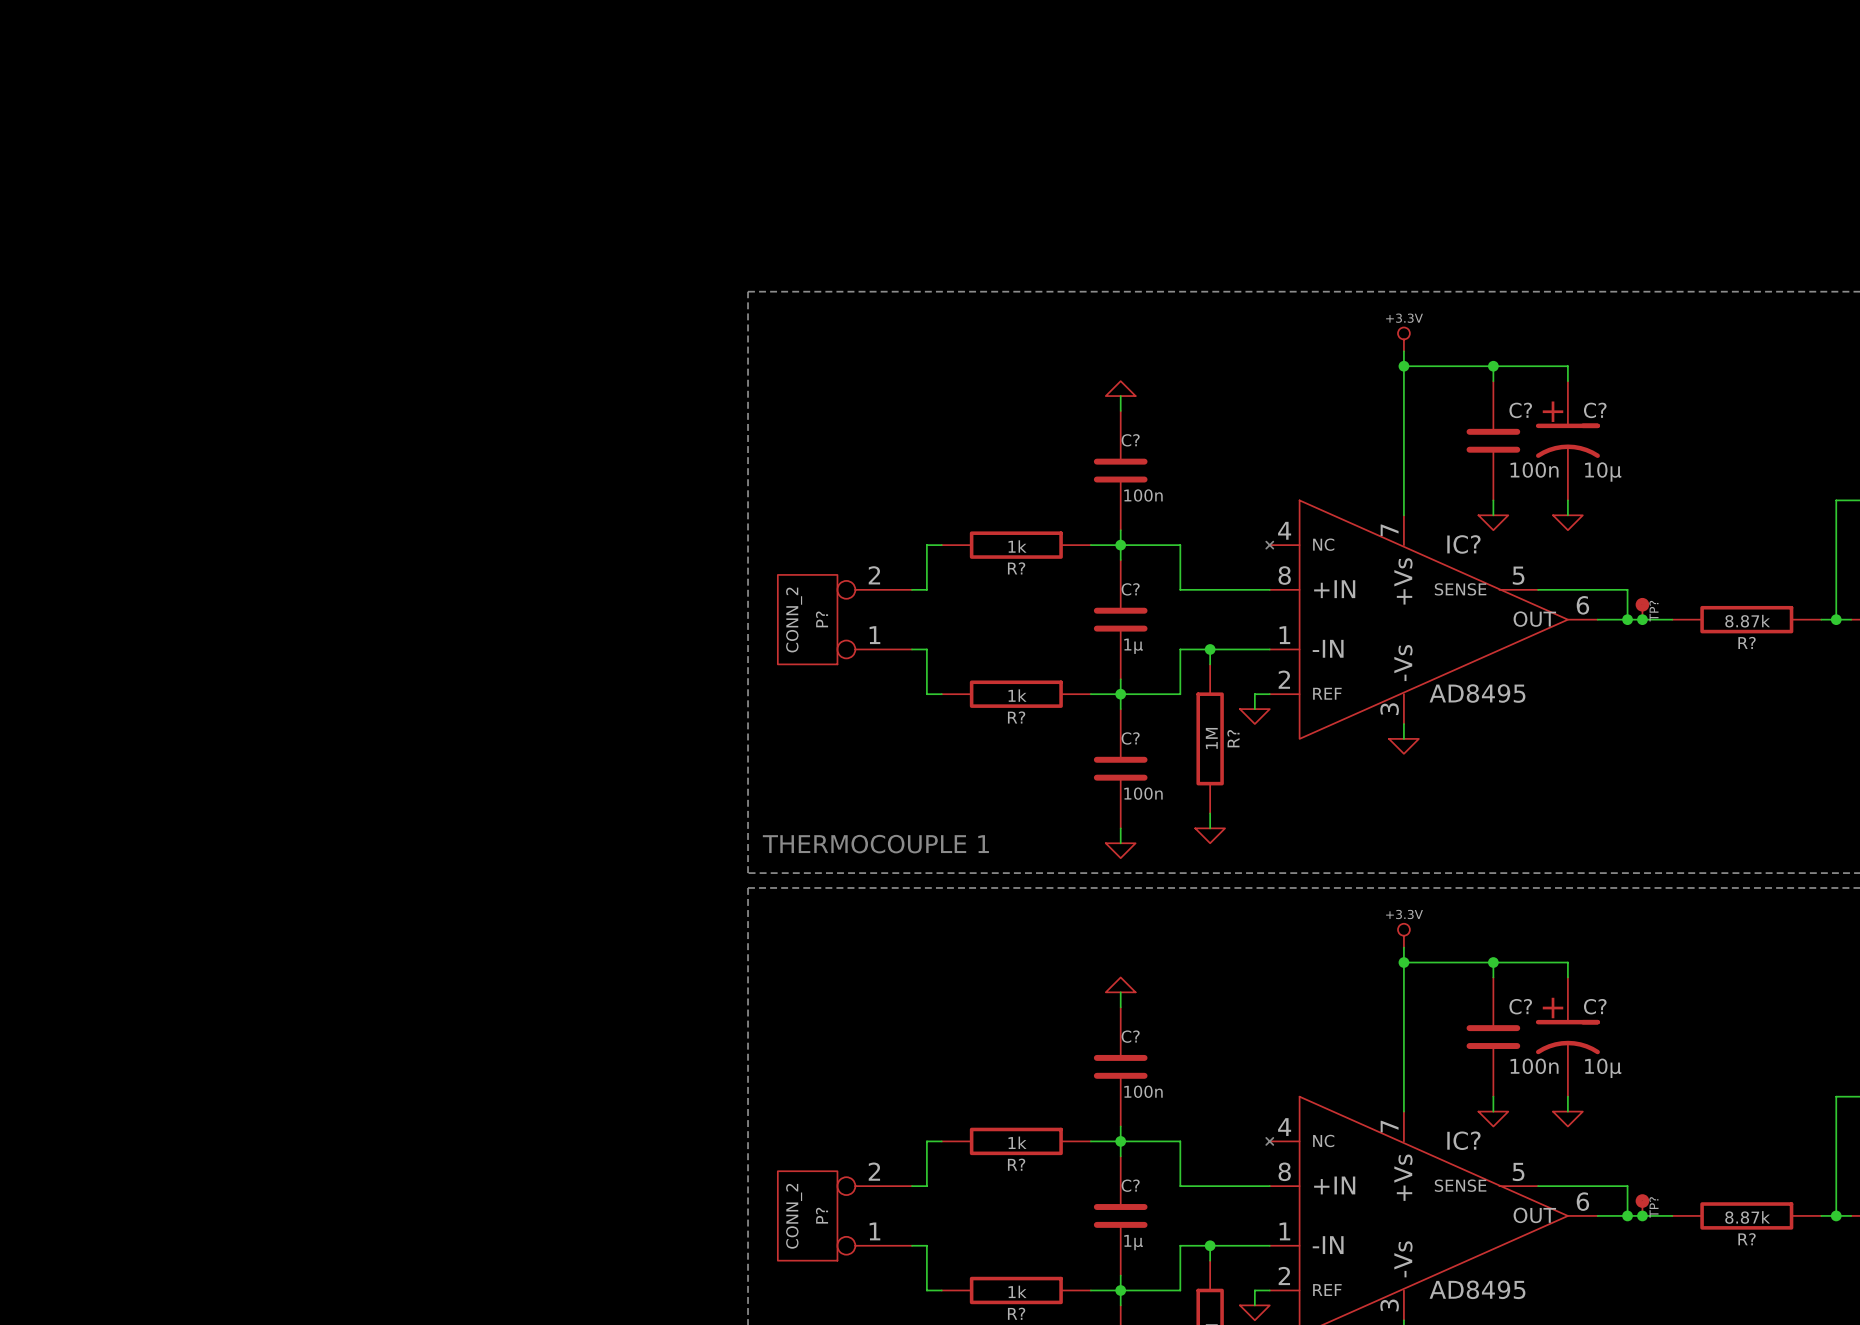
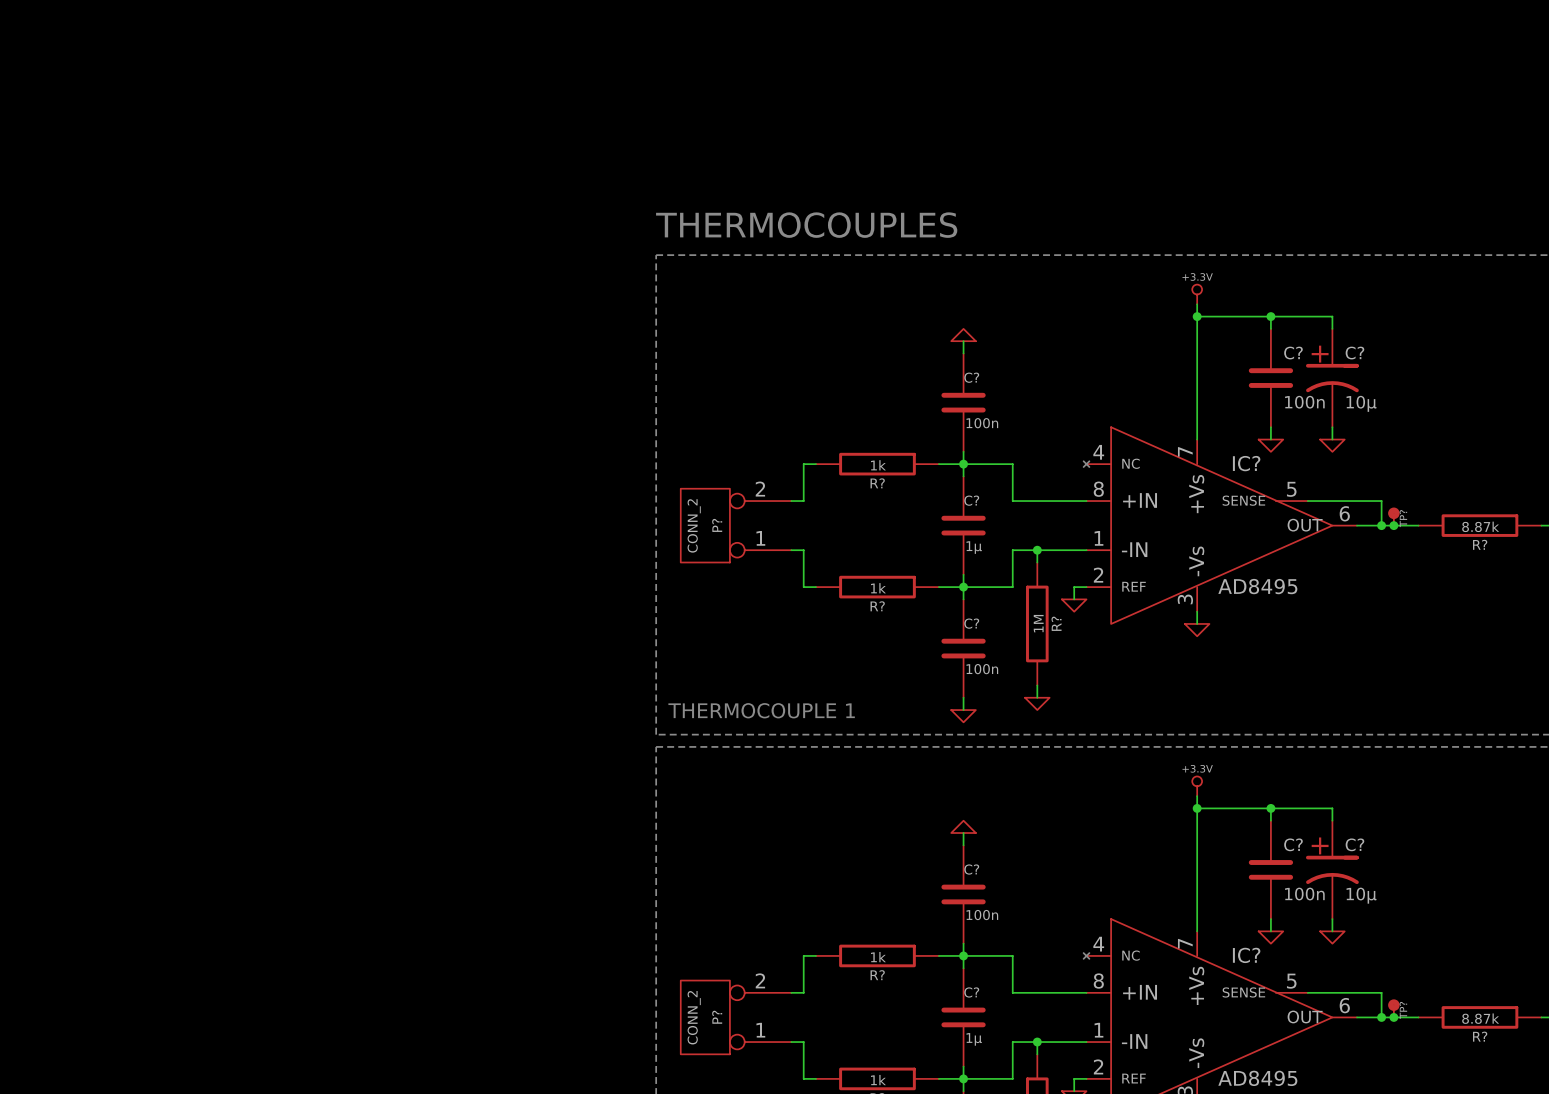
text: none -> THERMOCOUPLES (806, 225)

